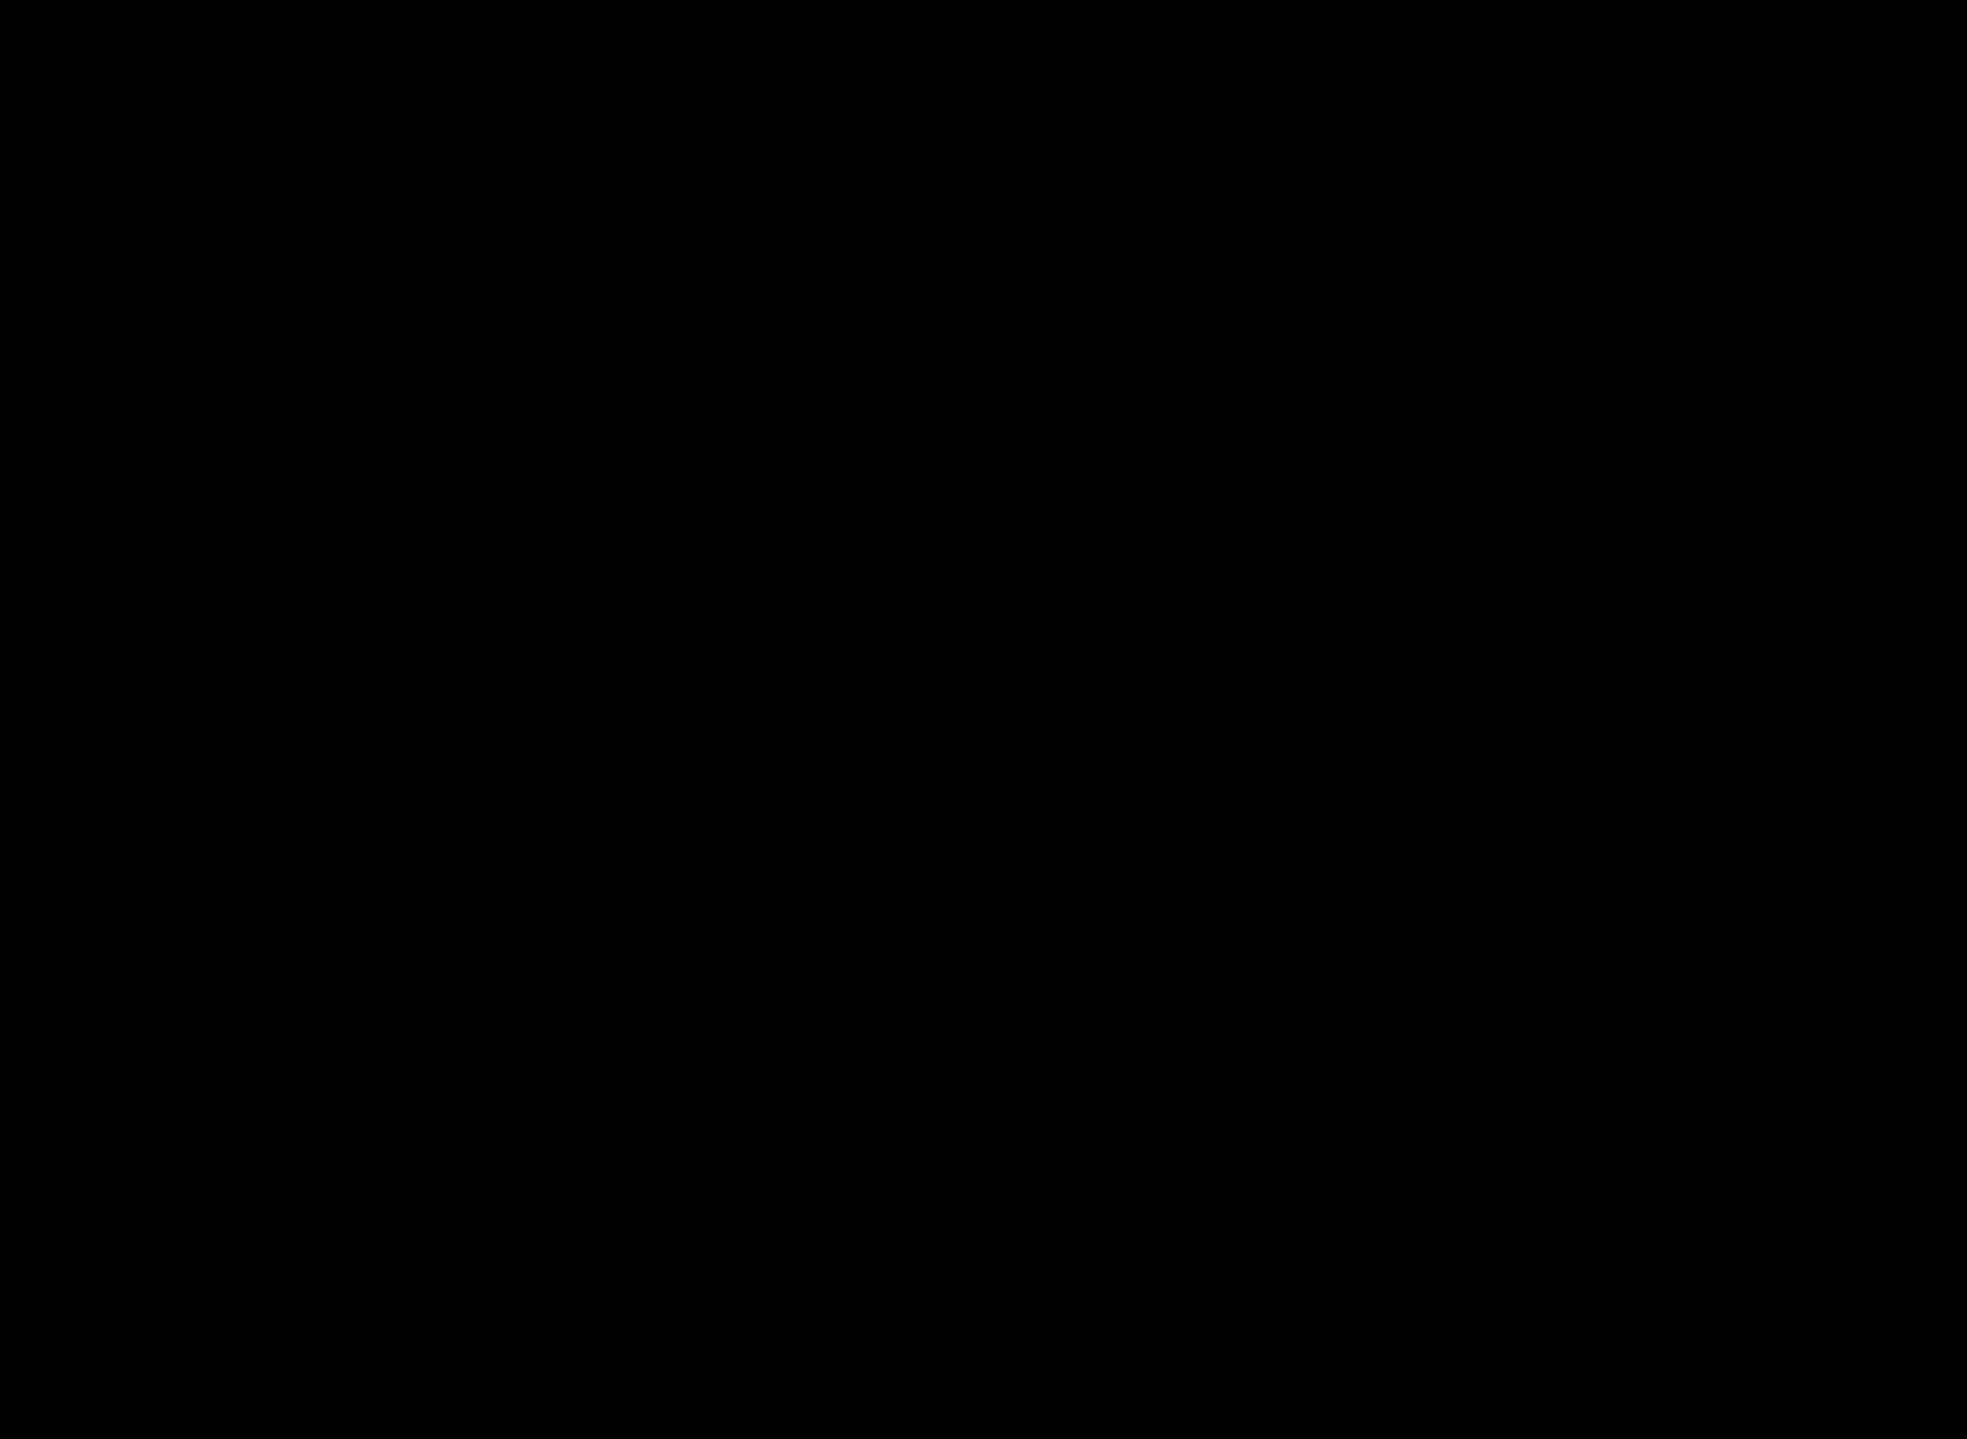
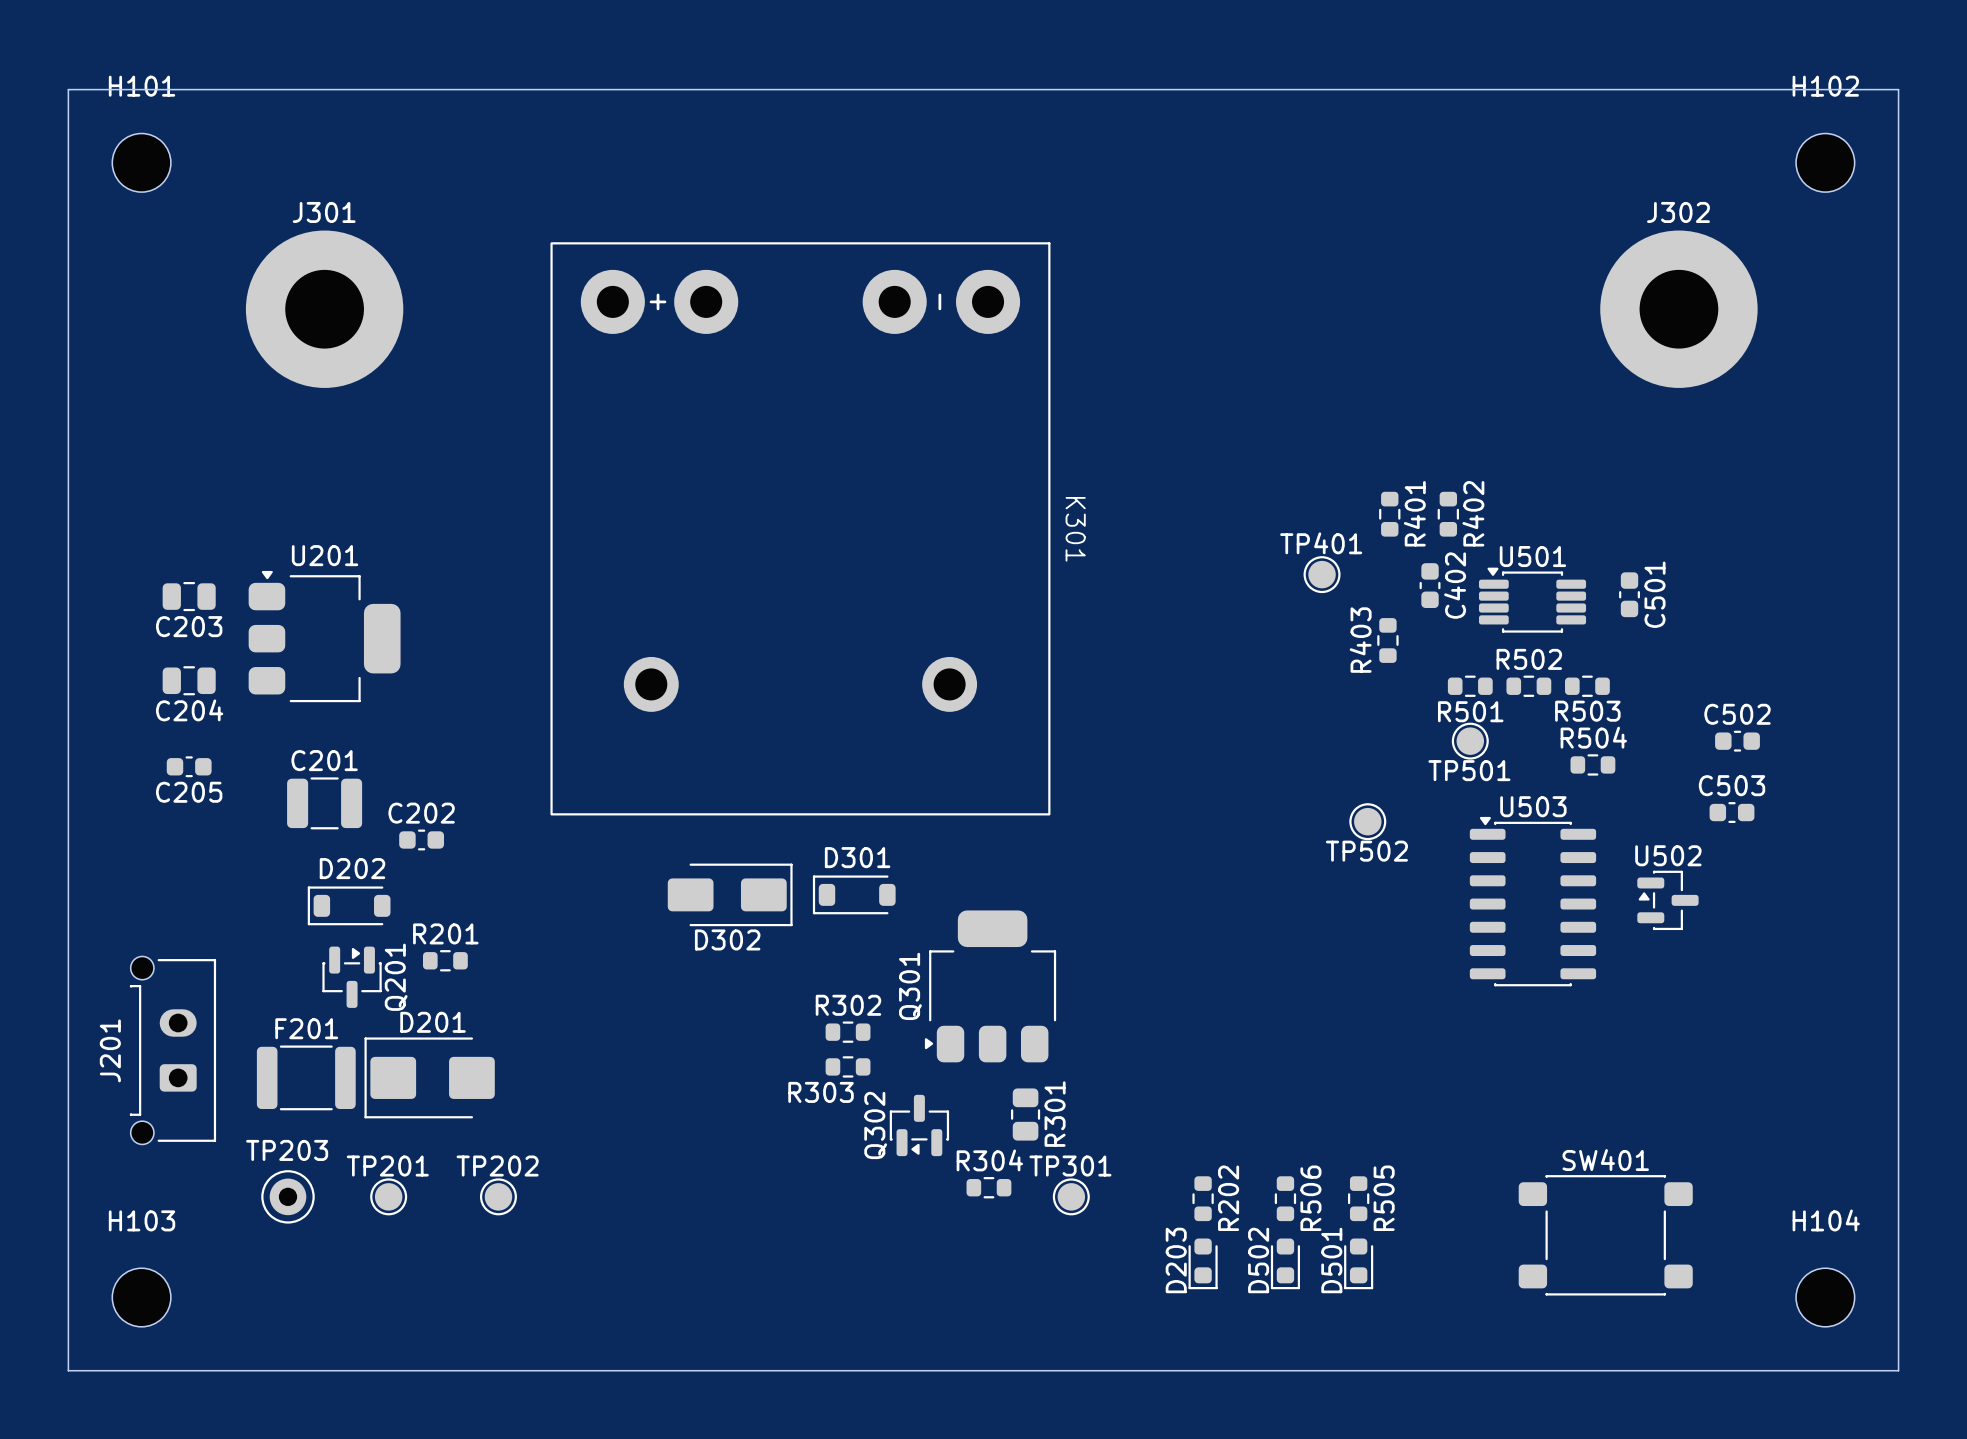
board edge: none -> (68, 89) (1898, 89) (1898, 1370) (68, 1370) (68, 89)
H101: none -> (141, 162)
H102: none -> (1825, 162)
J301: none -> (324, 309)
J302: none -> (1678, 309)
R401: none -> (1389, 514)
R402: none -> (1448, 514)
K301: none -> (800, 528)
TP401: none -> (1322, 574)
C402: none -> (1430, 585)
C501: none -> (1629, 594)
C203: none -> (189, 596)
U501: none -> (1532, 600)
U201: none -> (324, 636)
R403: none -> (1387, 640)
C204: none -> (189, 680)
R501: none -> (1470, 686)
R502: none -> (1528, 686)
R503: none -> (1587, 686)
TP501: none -> (1470, 741)
C502: none -> (1737, 741)
R504: none -> (1592, 764)
C205: none -> (189, 766)
C201: none -> (324, 803)
C503: none -> (1732, 812)
TP502: none -> (1367, 821)
C202: none -> (421, 839)
D302: none -> (730, 894)
D301: none -> (854, 894)
U502: none -> (1667, 900)
U503: none -> (1532, 901)
D202: none -> (349, 905)
R201: none -> (445, 960)
Q201: none -> (352, 977)
Q301: none -> (990, 986)
R302: none -> (848, 1032)
J201: none -> (172, 1050)
R303: none -> (848, 1066)
F201: none -> (306, 1077)
D201: none -> (429, 1077)
R301: none -> (1025, 1114)
Q302: none -> (919, 1125)
R304: none -> (988, 1187)
TP203: none -> (288, 1196)
TP201: none -> (388, 1196)
TP202: none -> (498, 1196)
TP301: none -> (1071, 1196)
R202: none -> (1203, 1198)
R506: none -> (1285, 1198)
R505: none -> (1358, 1198)
SW401: none -> (1605, 1235)
D203: none -> (1203, 1263)
D502: none -> (1285, 1263)
D501: none -> (1358, 1263)
H103: none -> (141, 1297)
H104: none -> (1825, 1297)

